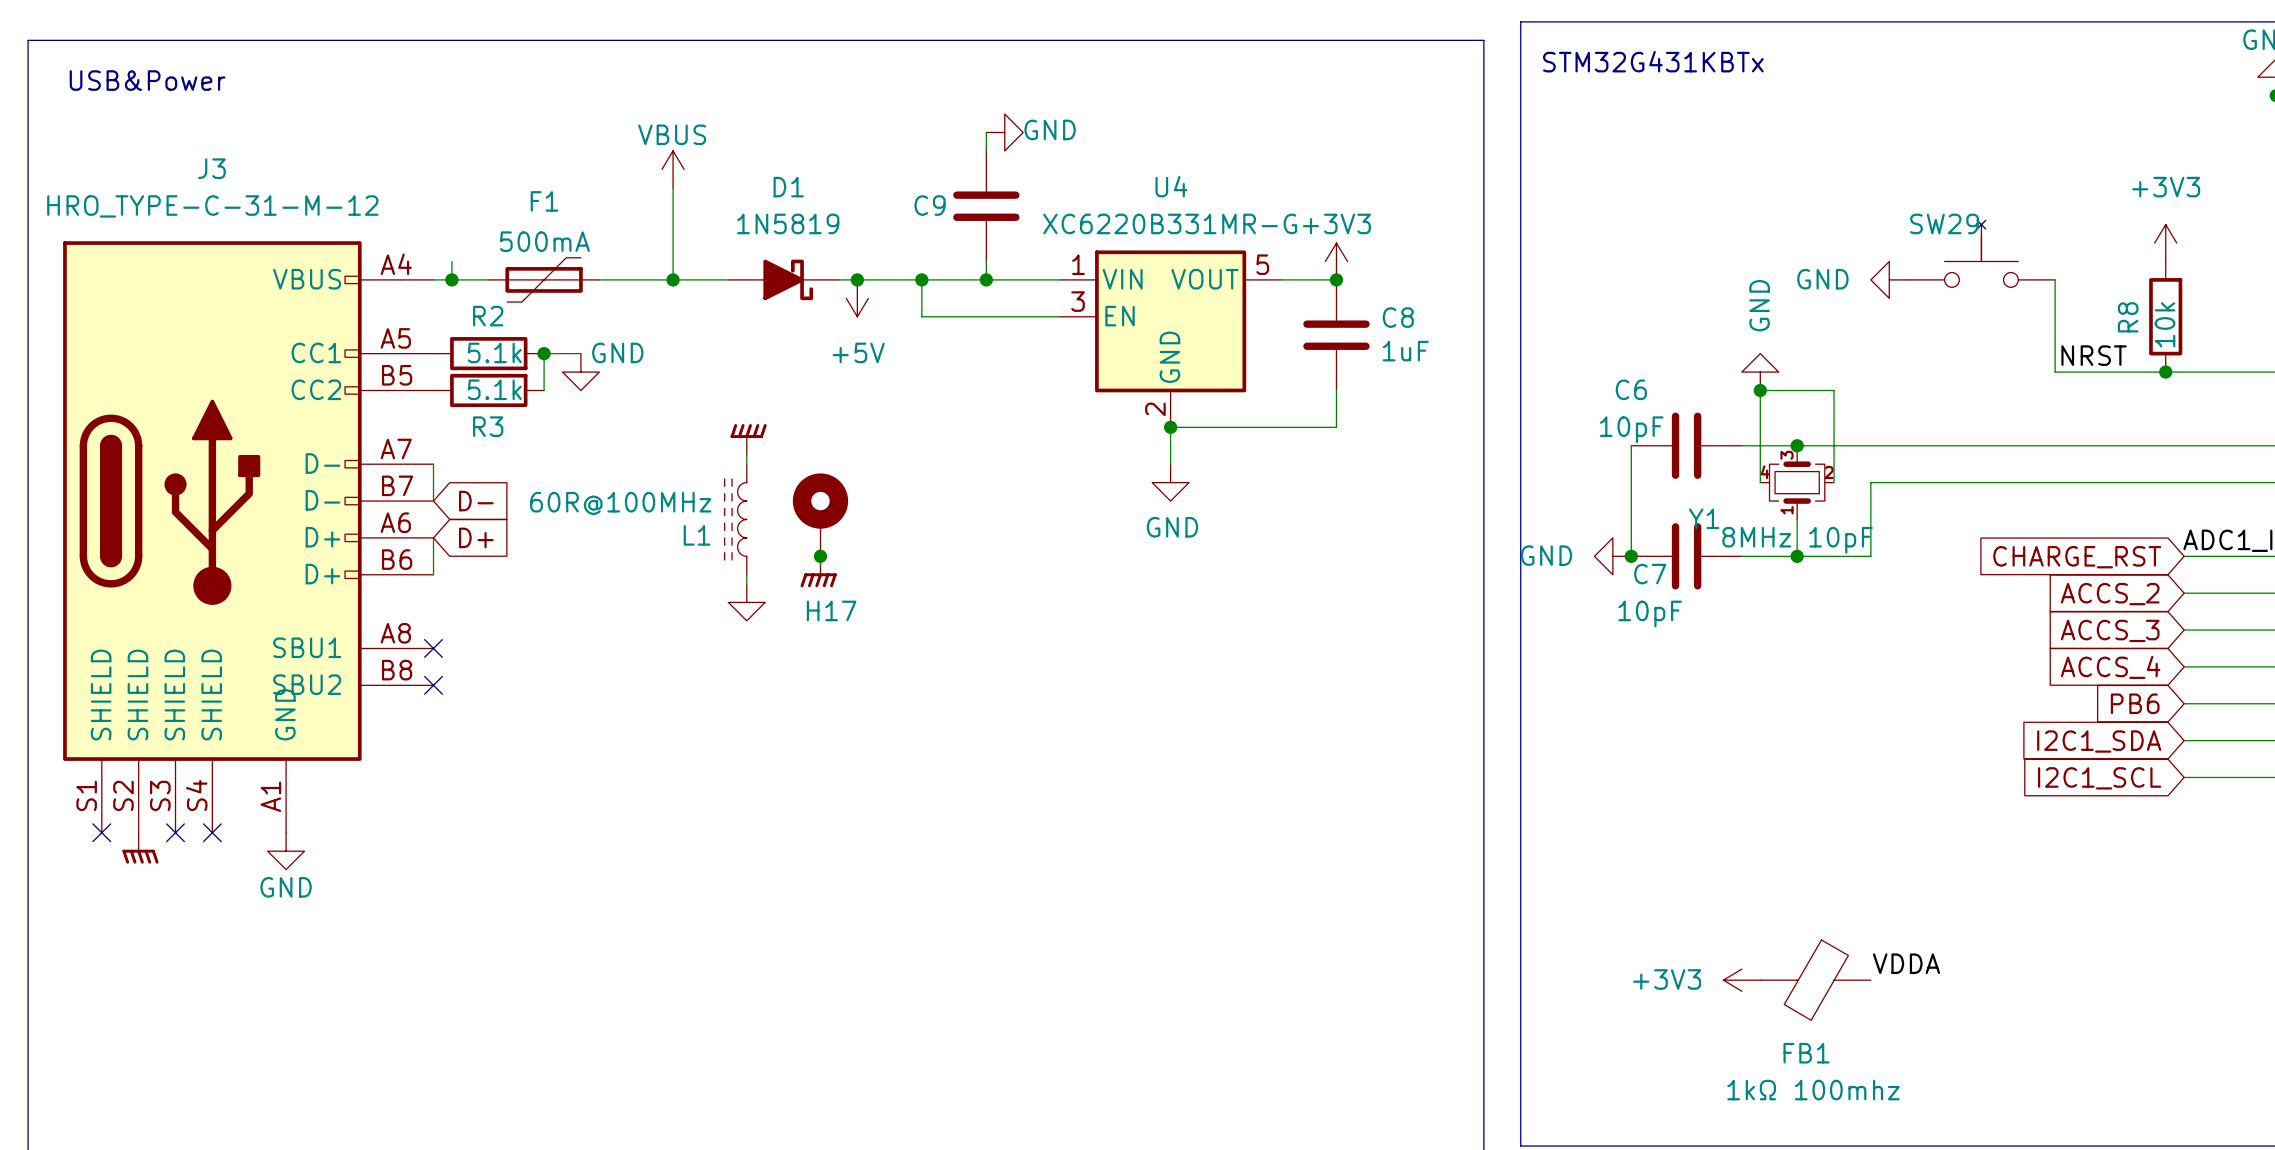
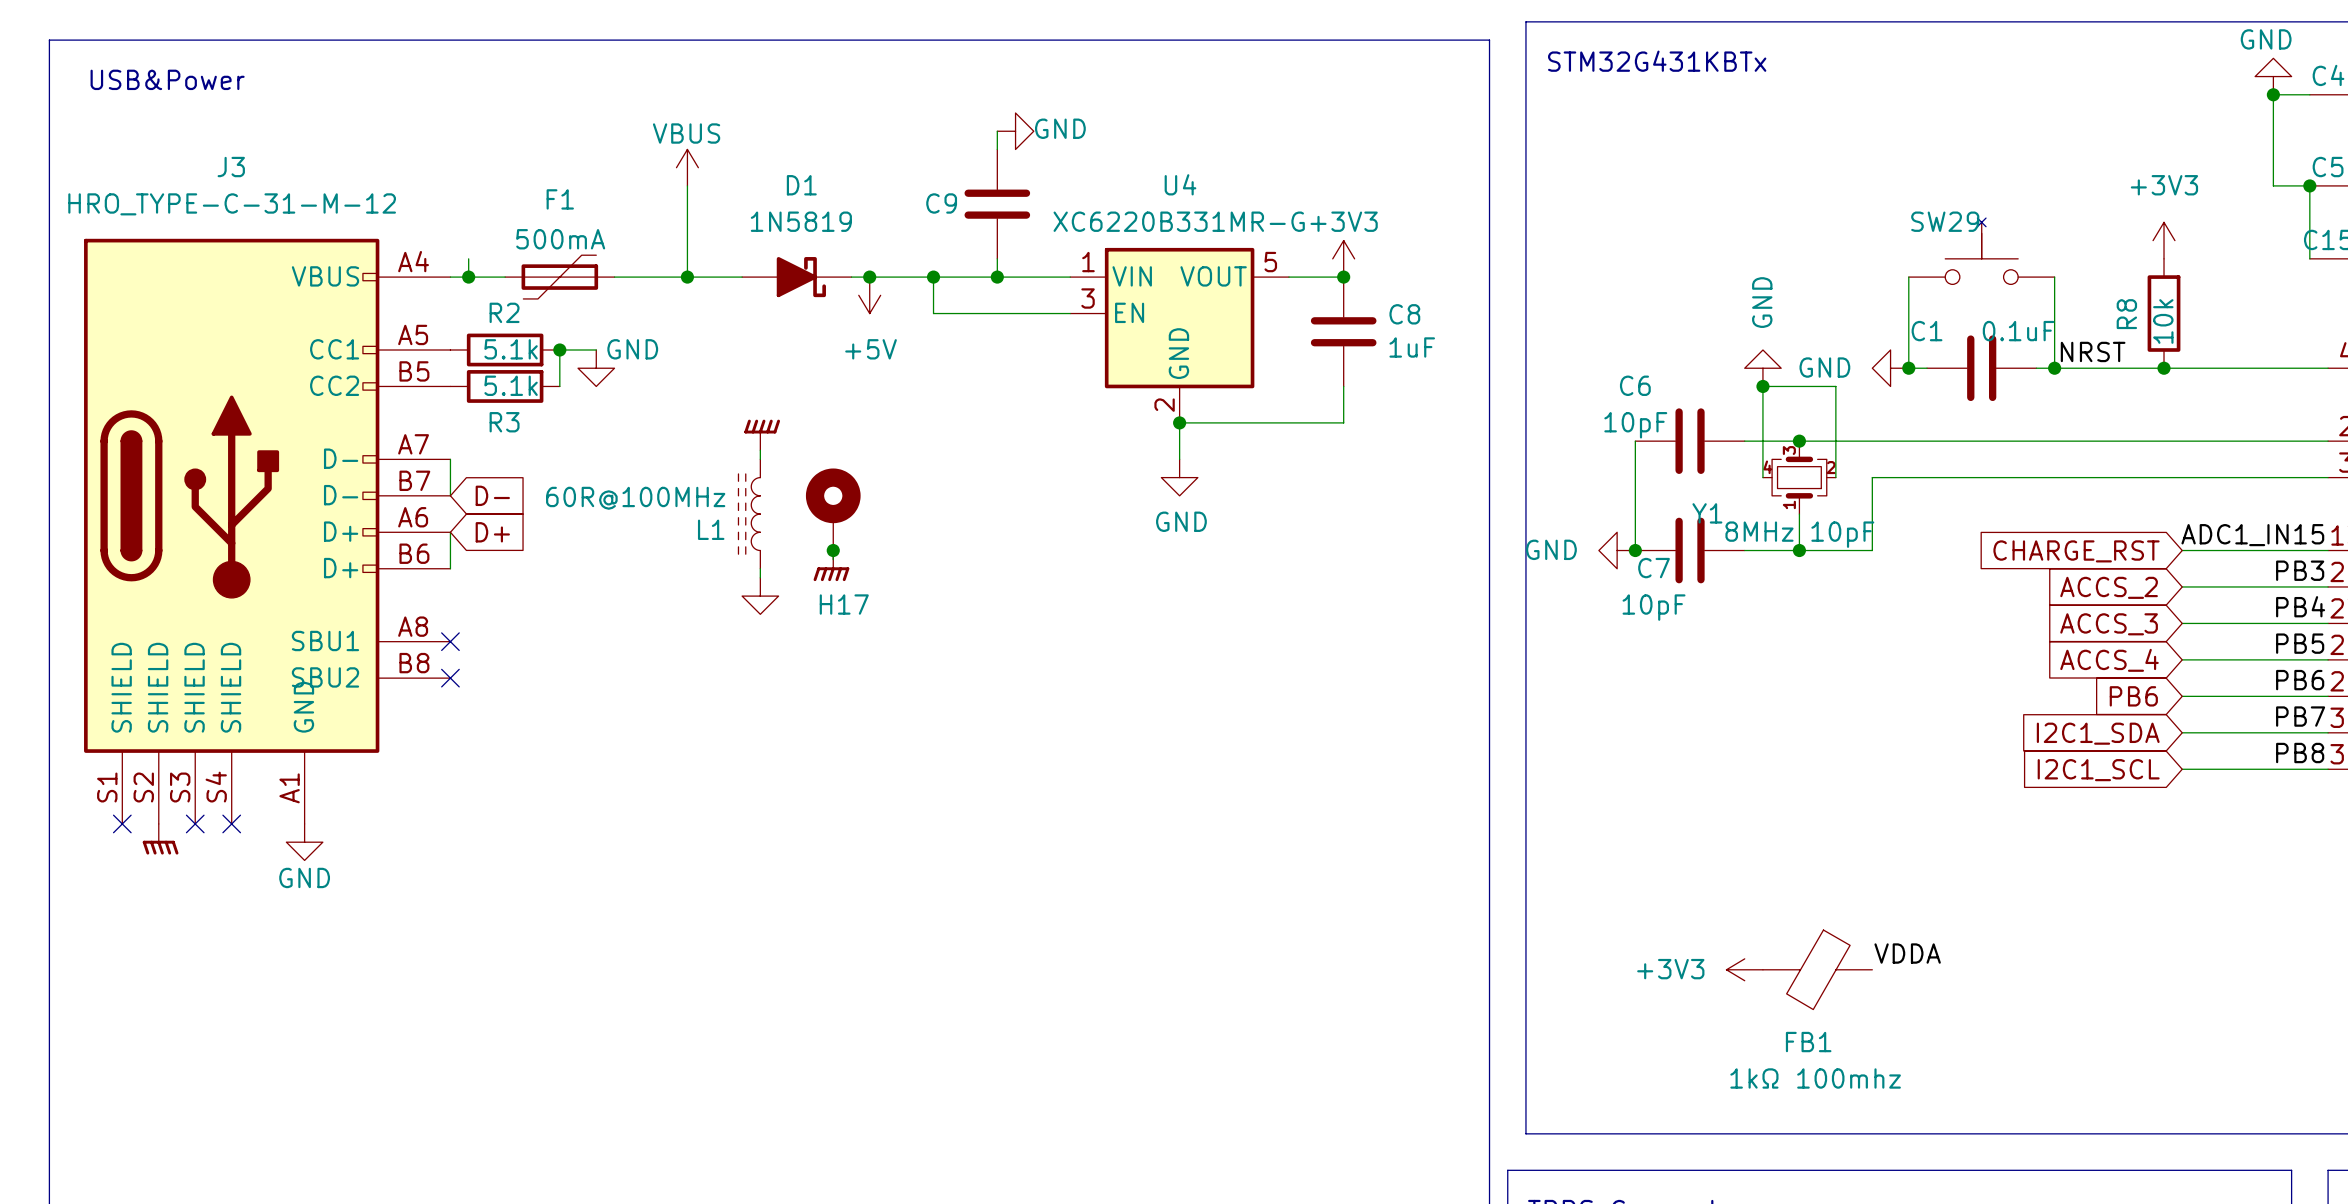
power symbol position: GND (1889, 279) -> GND (1890, 368)
wire: none -> (1908, 277) (1908, 368) (1927, 368)
junction: none -> (1908, 368)
C1: none -> 0.1uF (1981, 368)
wire: none -> (2036, 368) (2054, 368)
junction: none -> (2054, 368)

